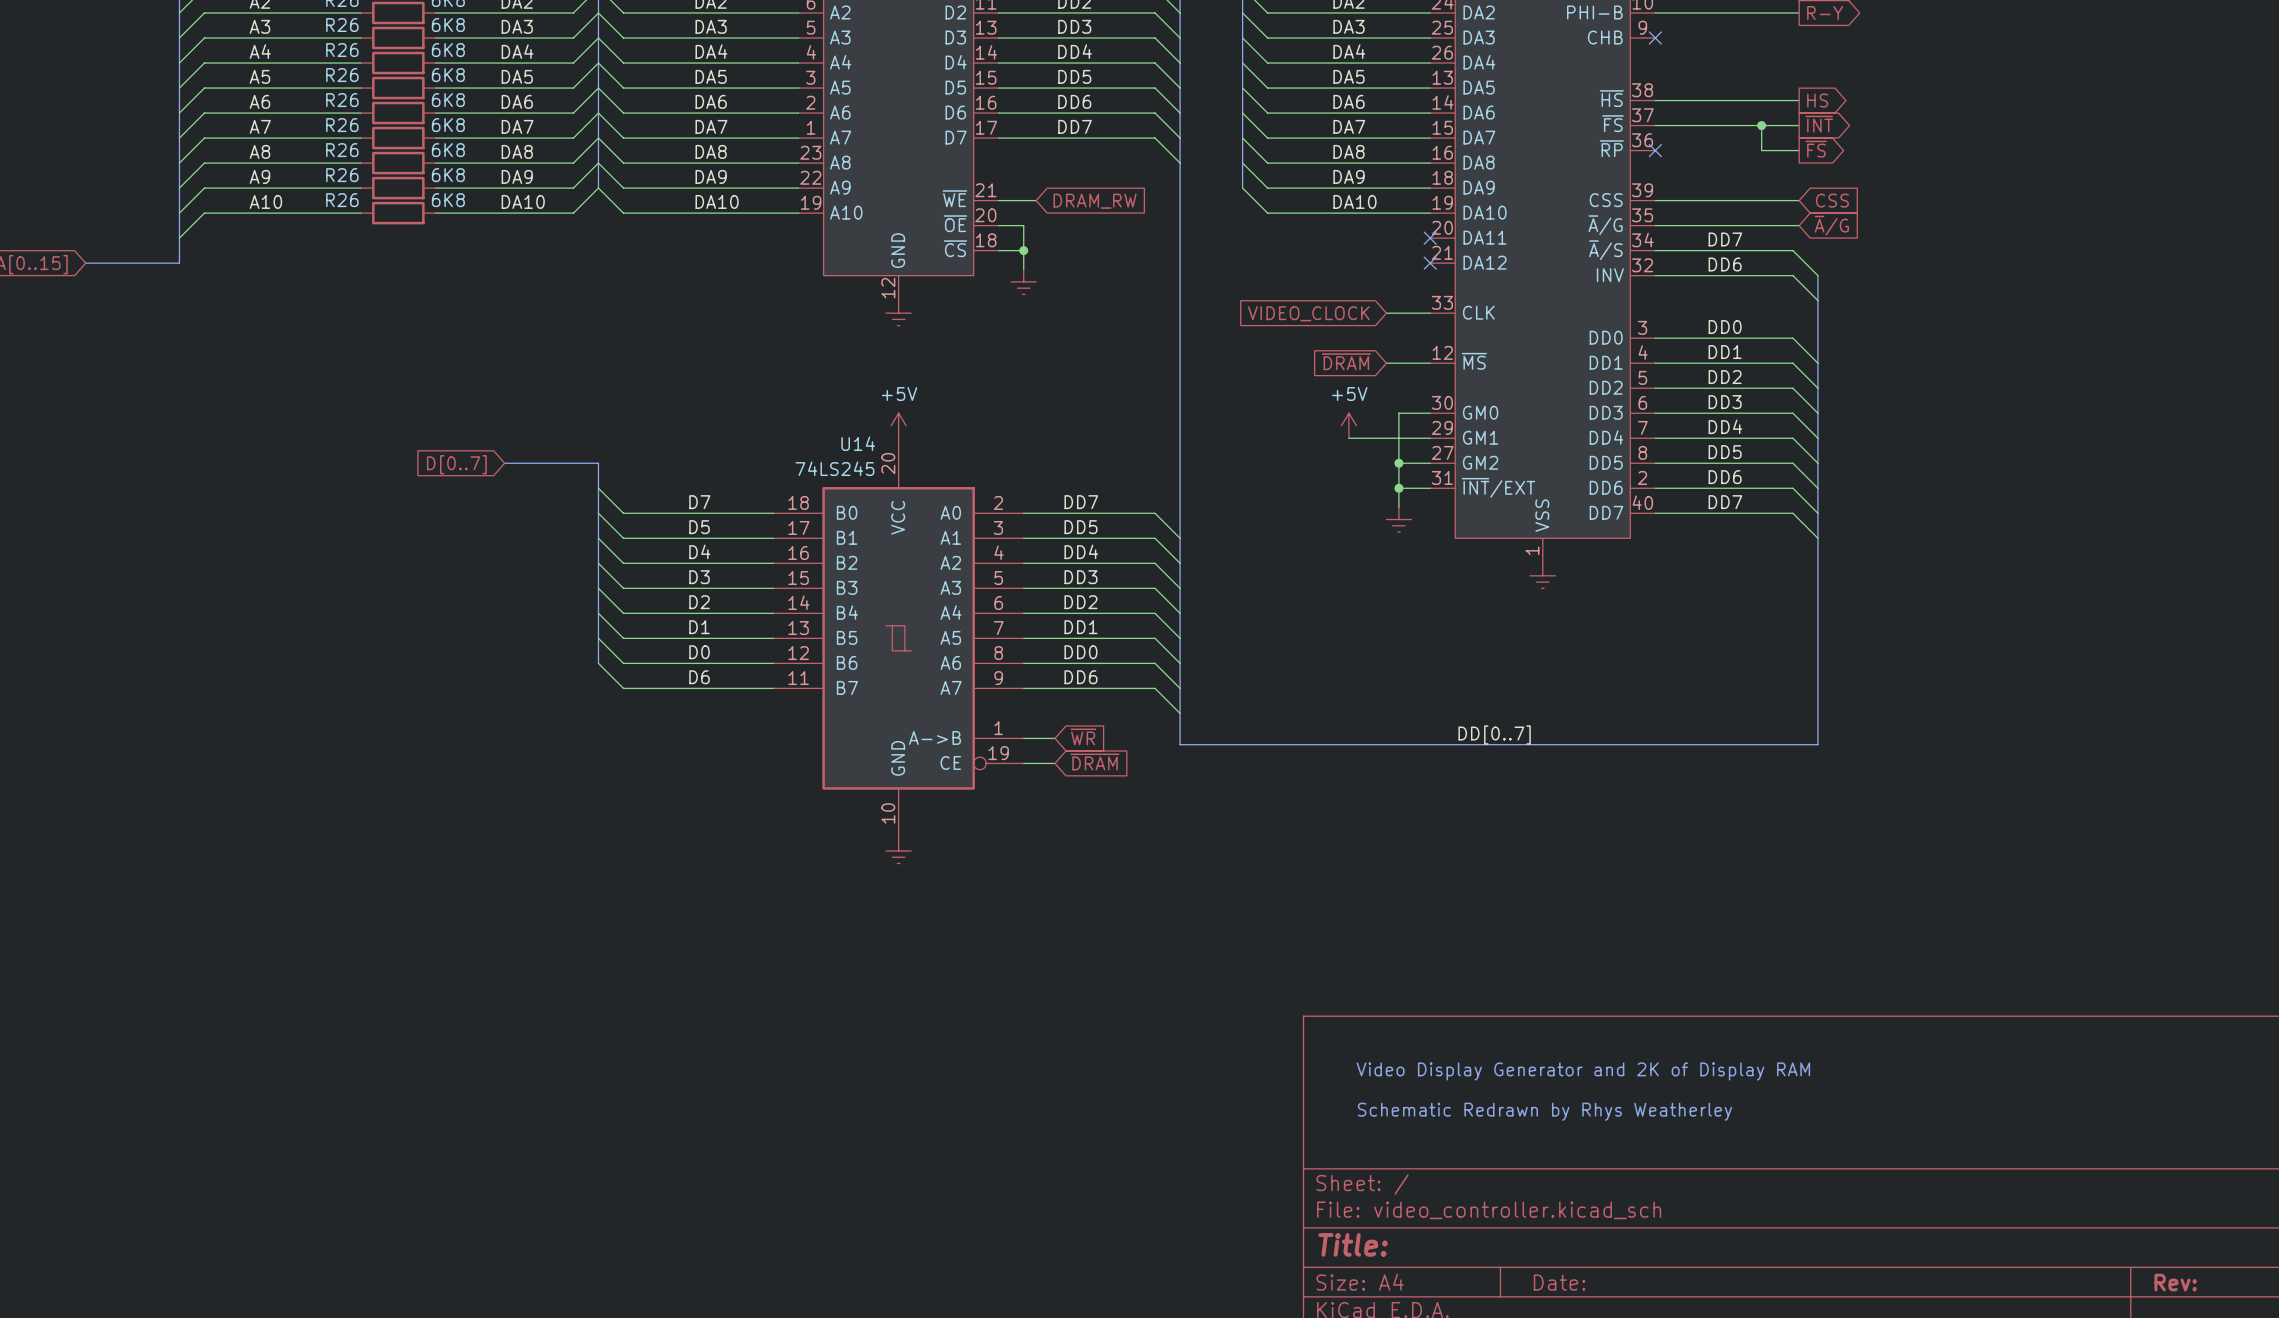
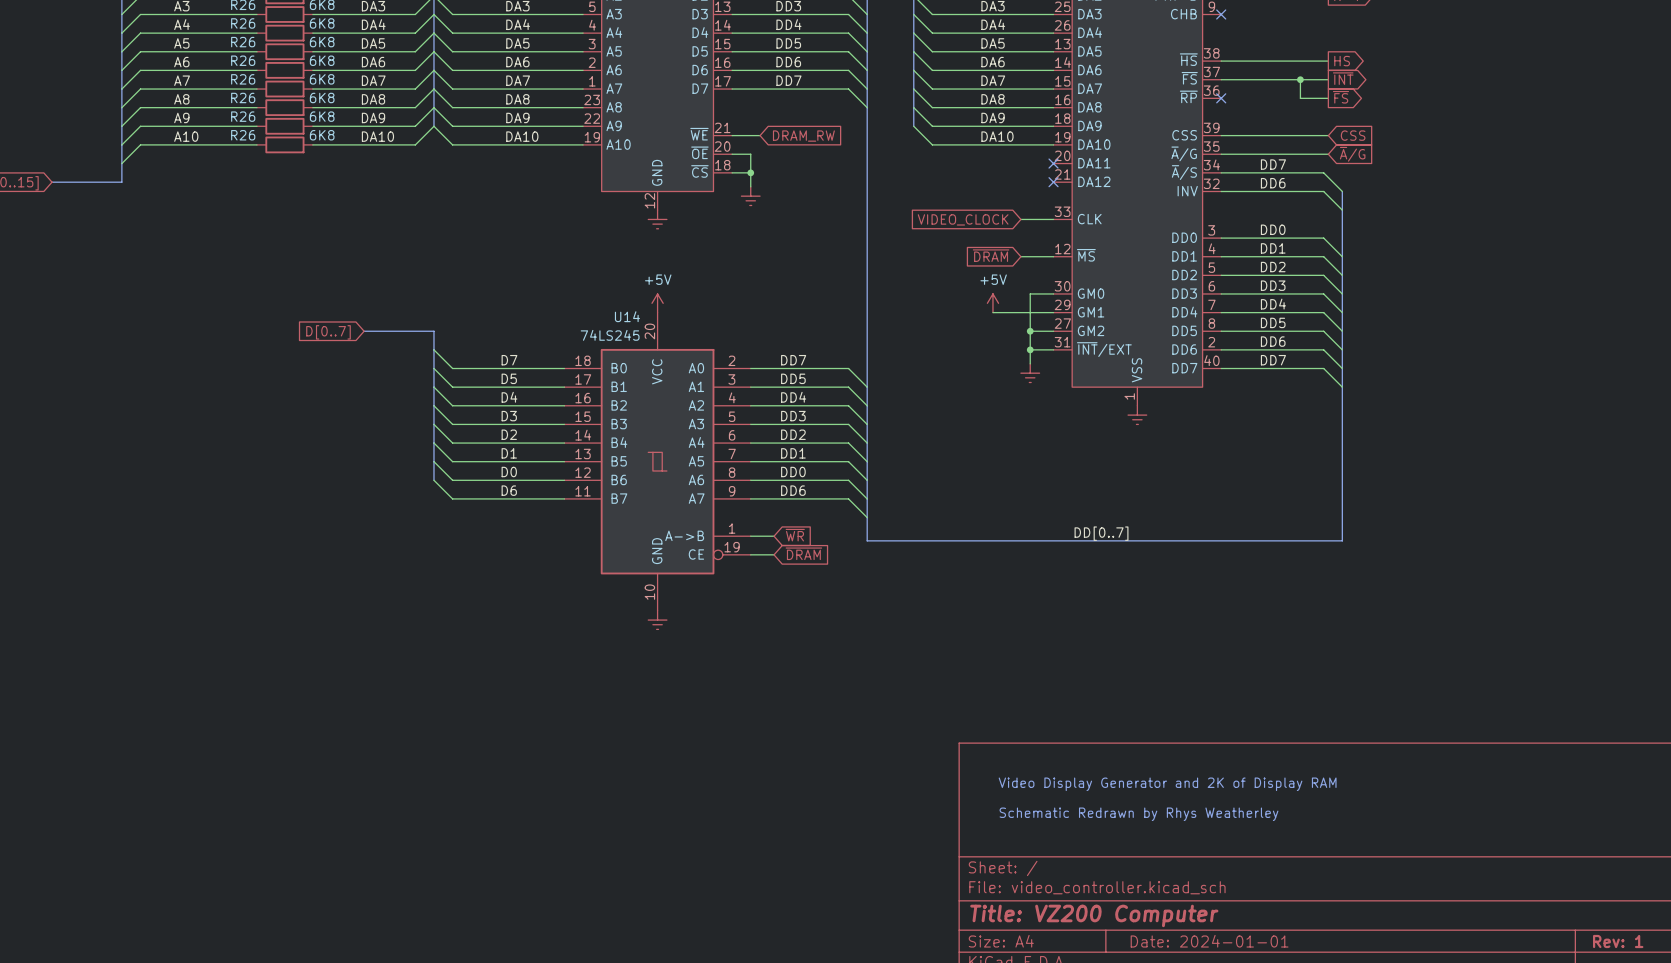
title block: Title: (1353, 1244) -> Title: VZ200 Computer (1094, 915)
title block: Date: (1559, 1282) -> Date: 2024-01-01 (1209, 941)
title block: Rev: (2175, 1282) -> Rev: 1 (1618, 941)

